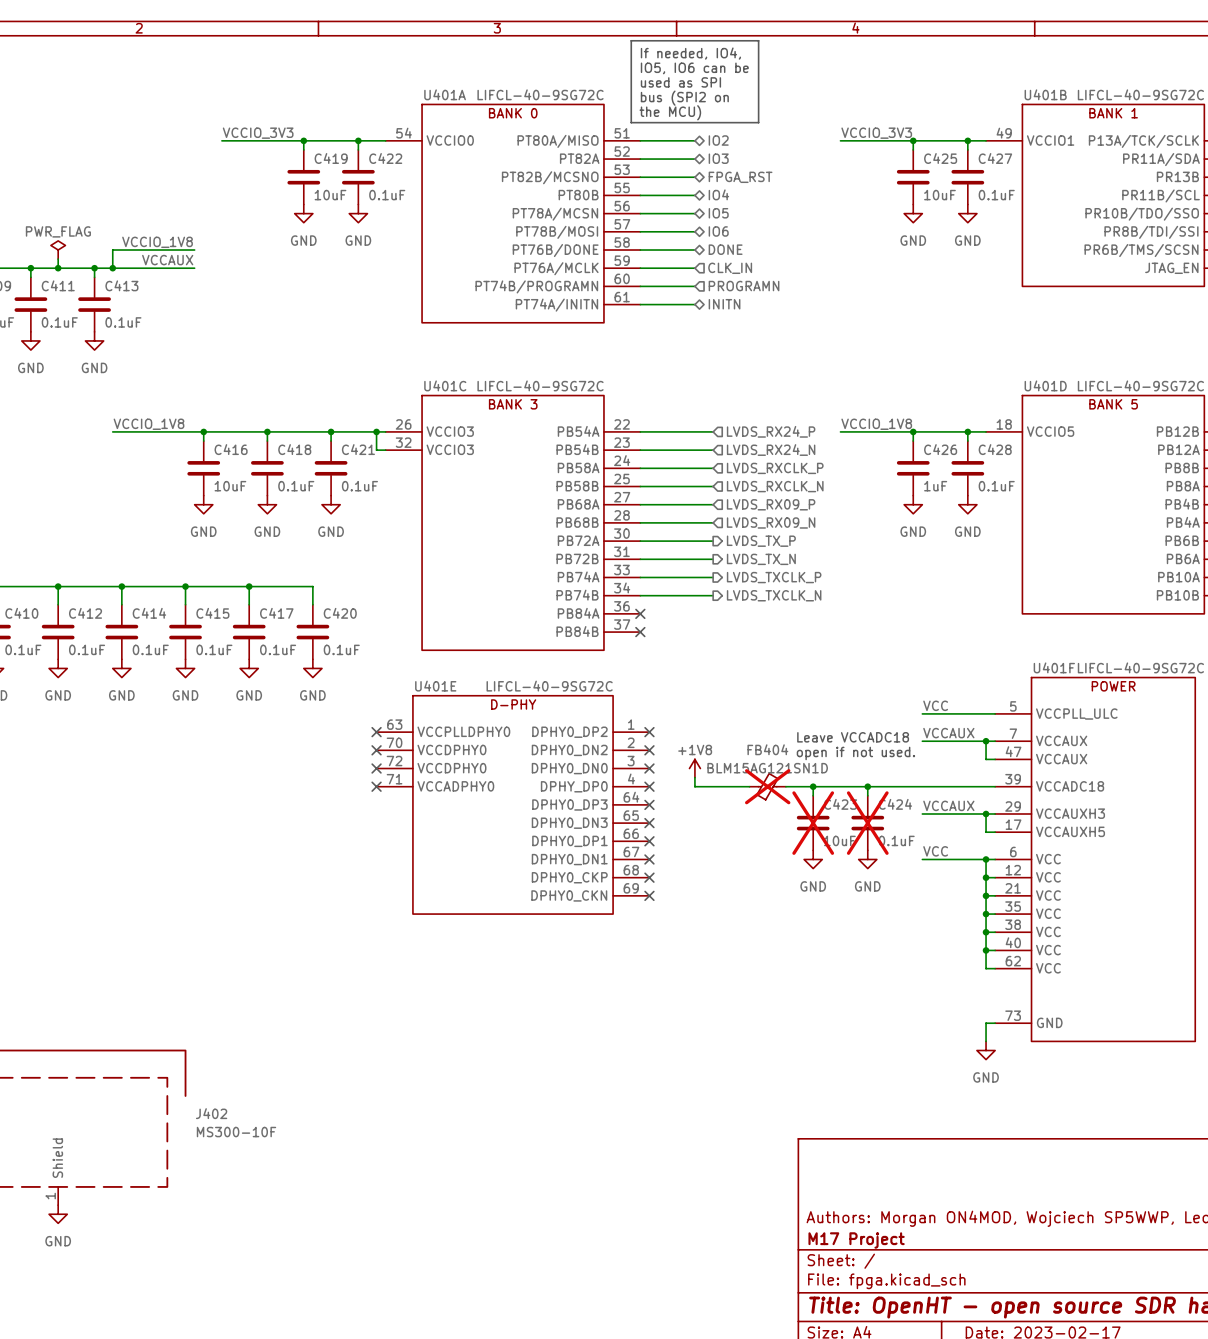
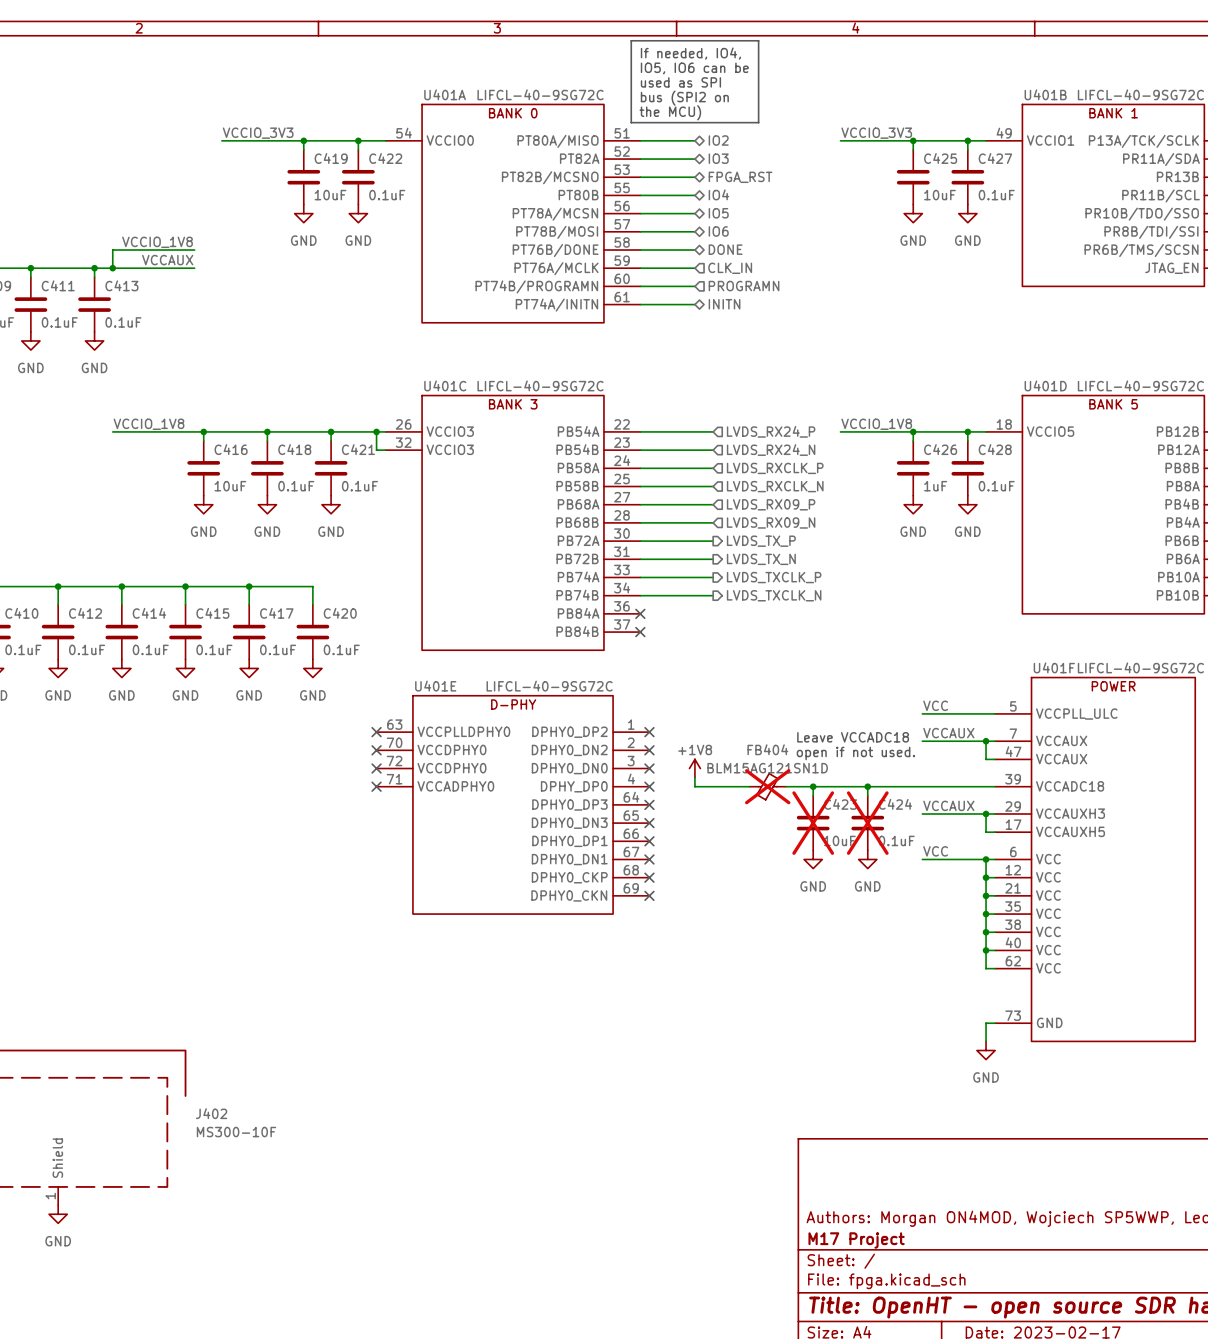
power symbol: PWR_FLAG (58, 250) -> none
wire: (58, 259) (58, 268) -> none
junction: (58, 268) -> none

